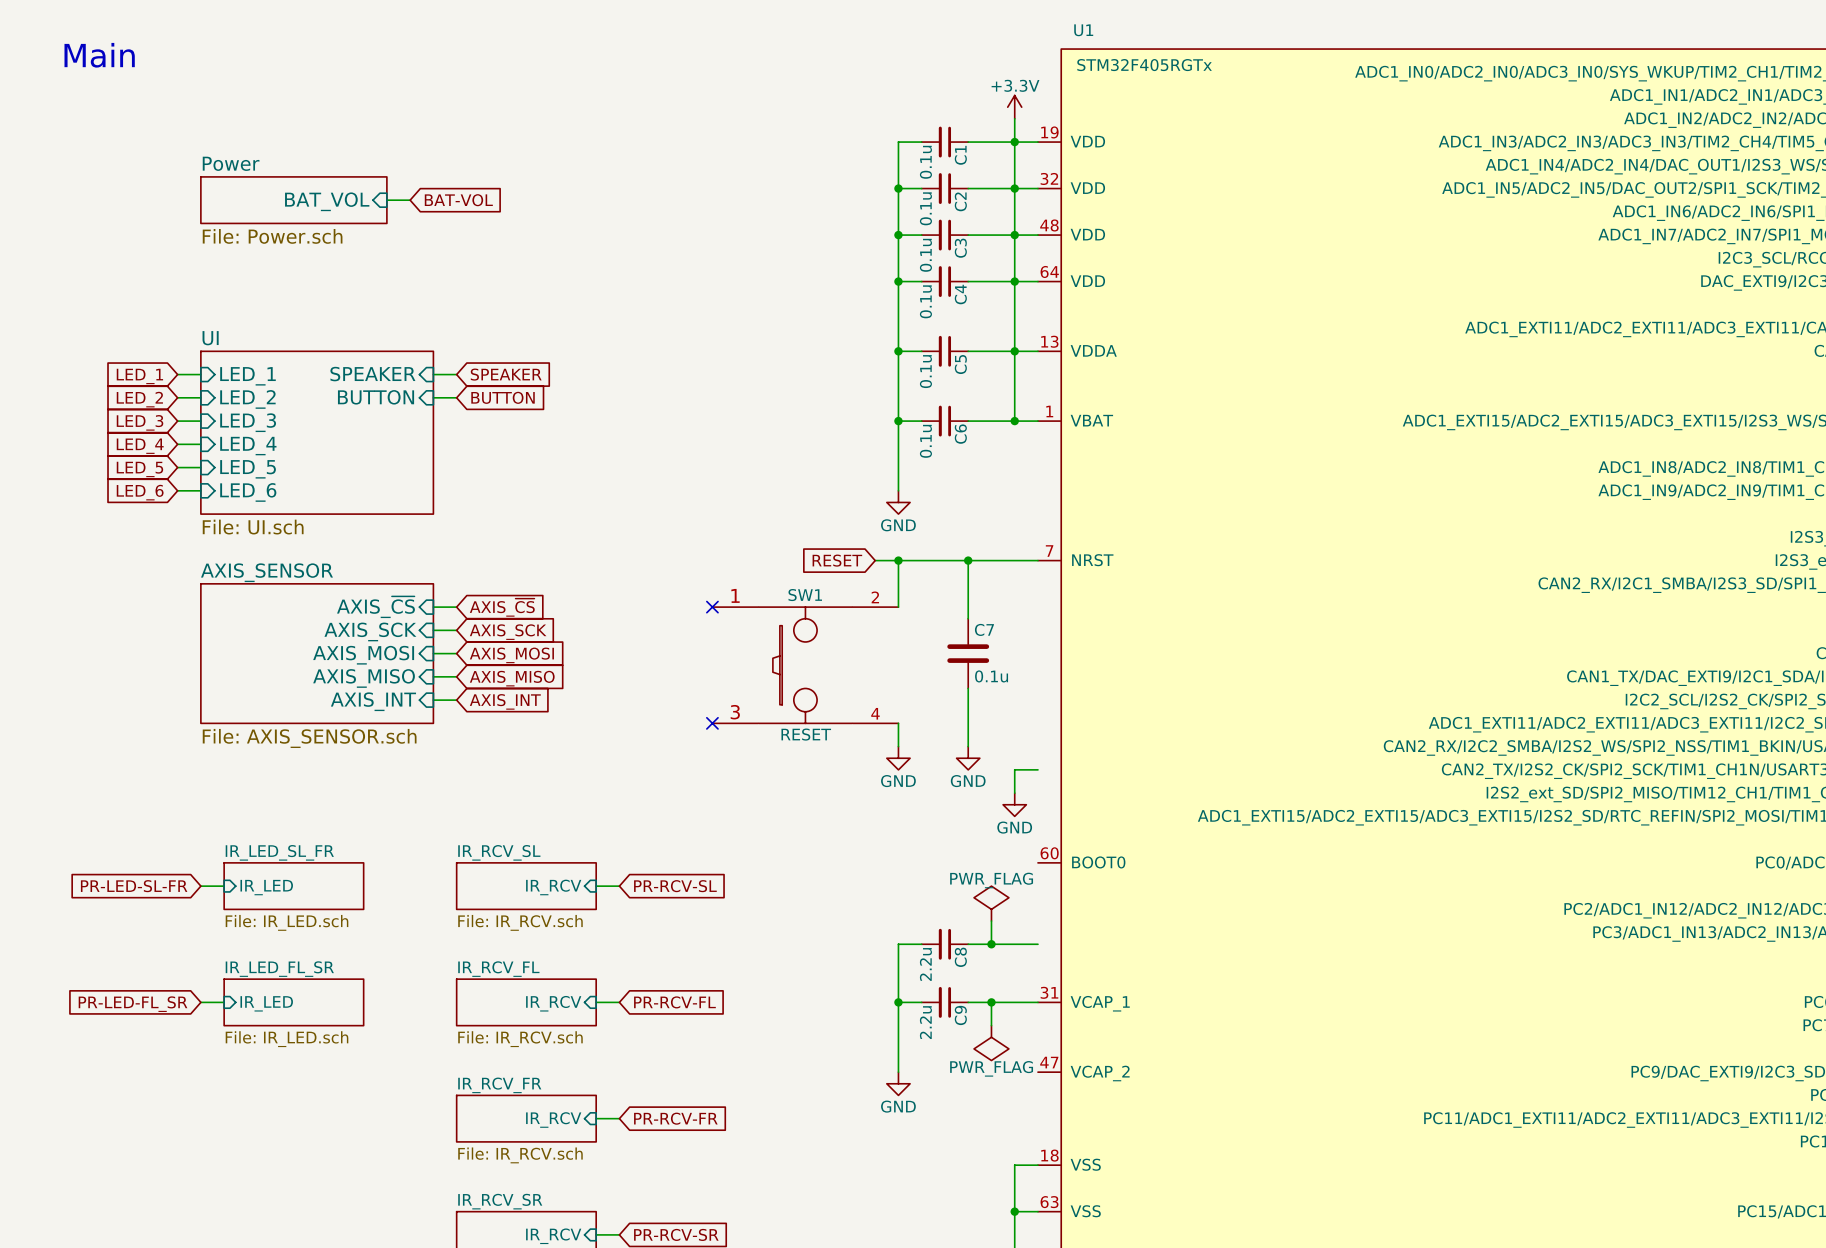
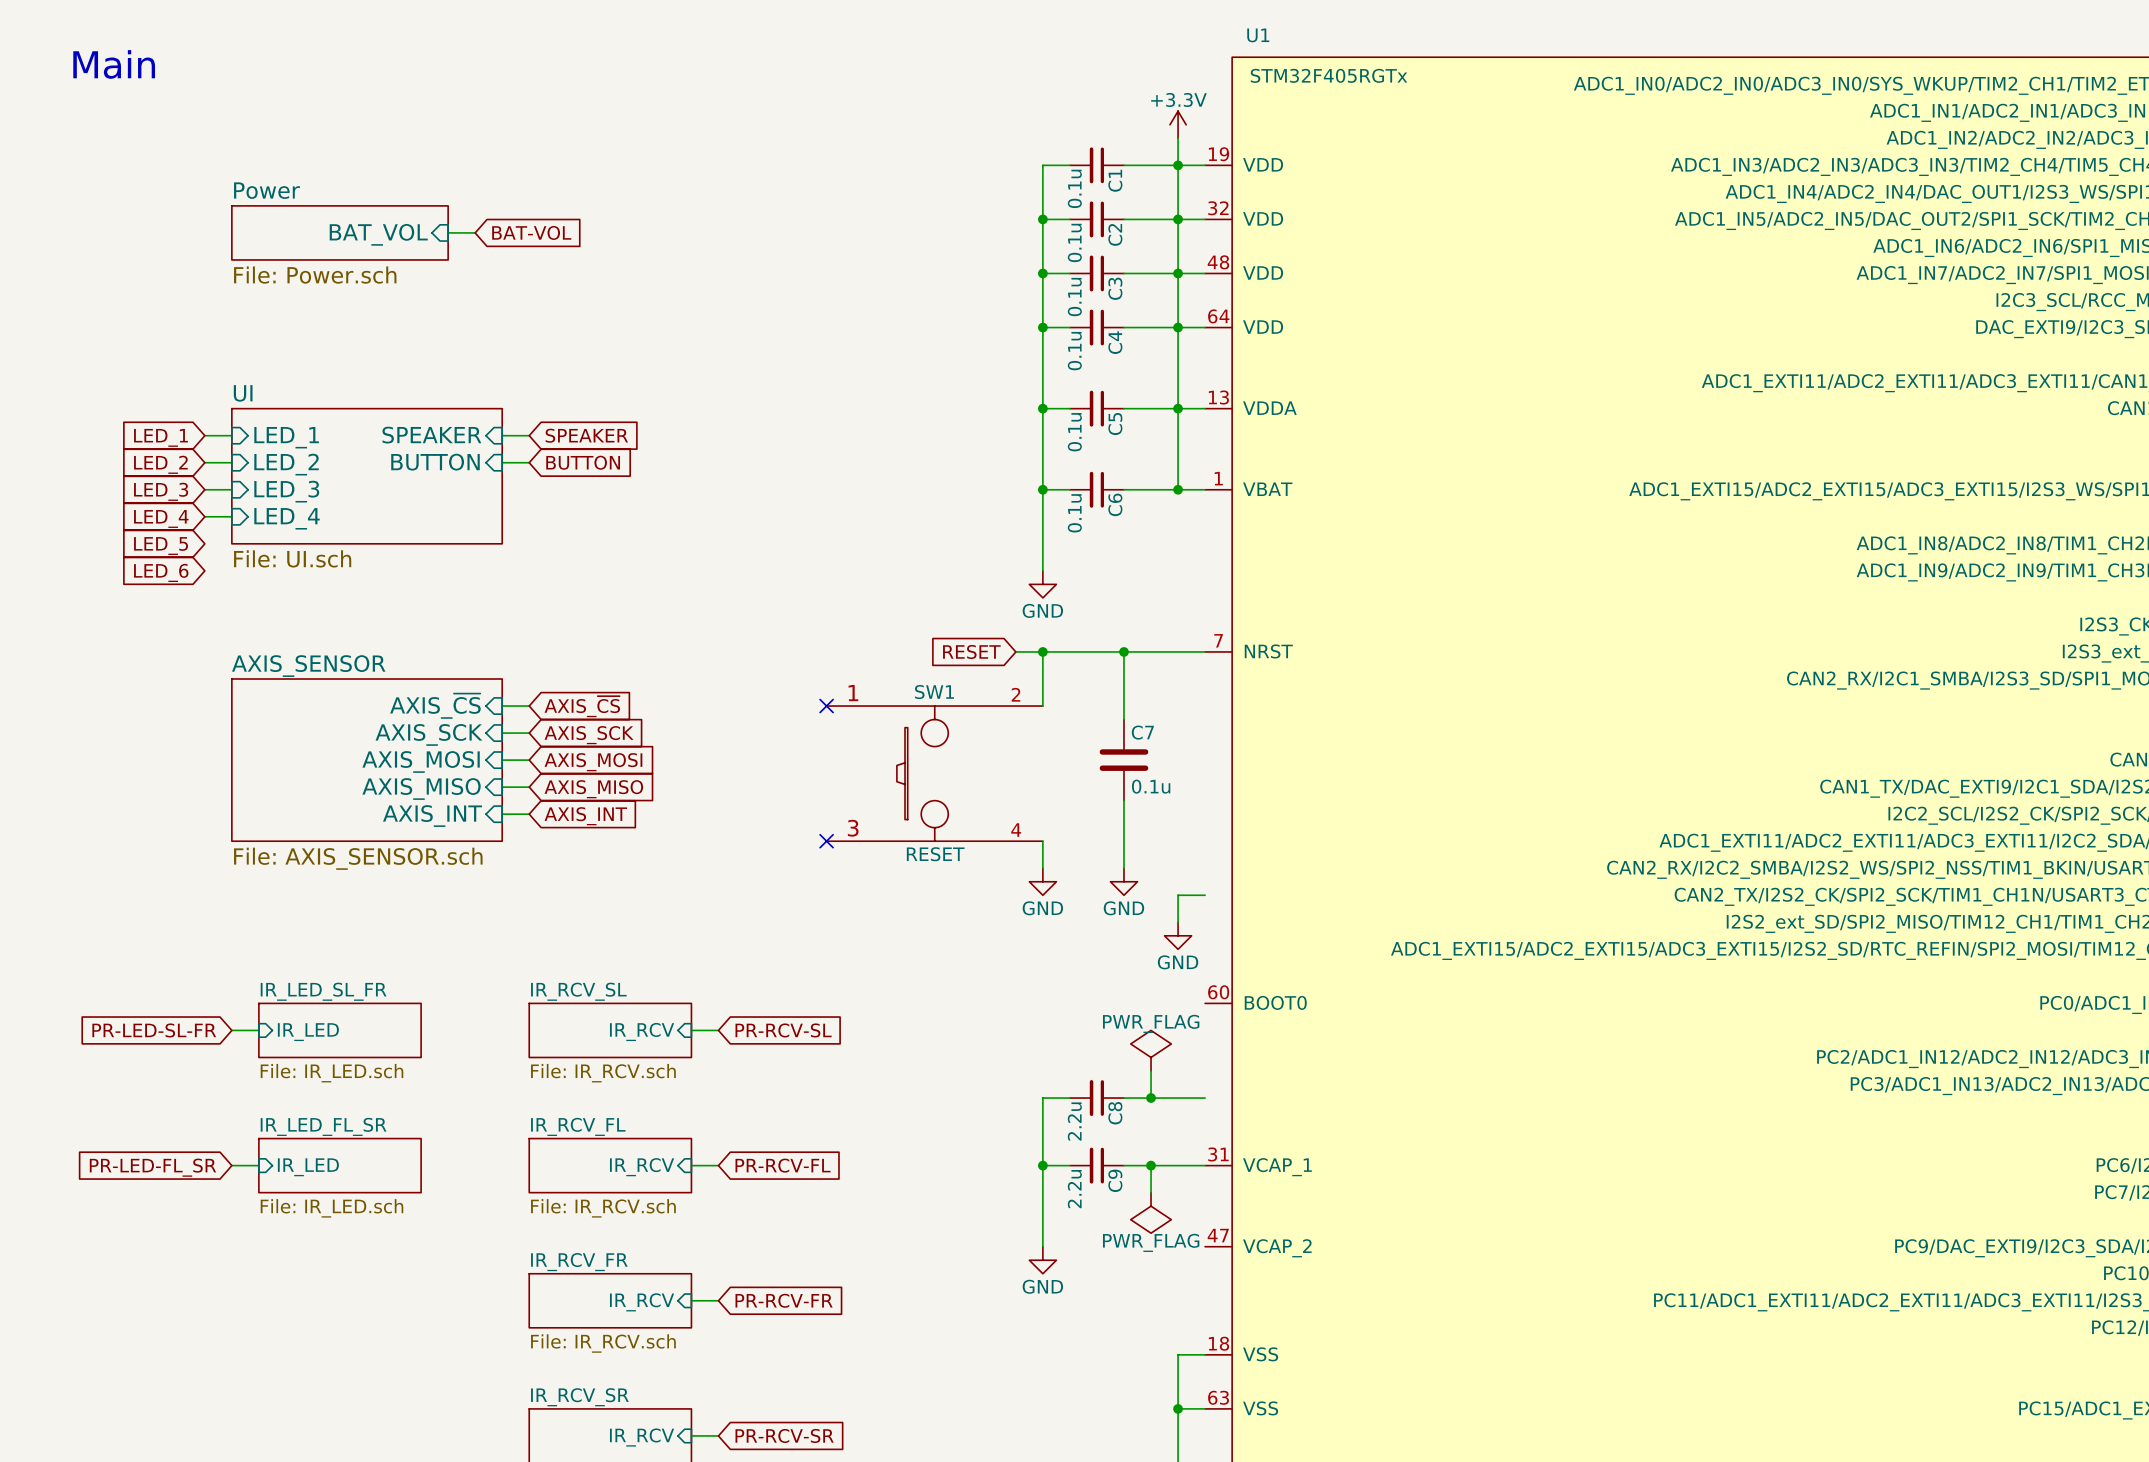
sheet UI: none -> File: UI.sch (367, 476)
sheet UI: File: UI.sch (317, 432) -> none
wire: (177, 467) (200, 467) -> none
sheet pin: LED_5 (248, 469) -> none
wire: (177, 490) (200, 490) -> none
sheet pin: LED_6 (248, 492) -> none

